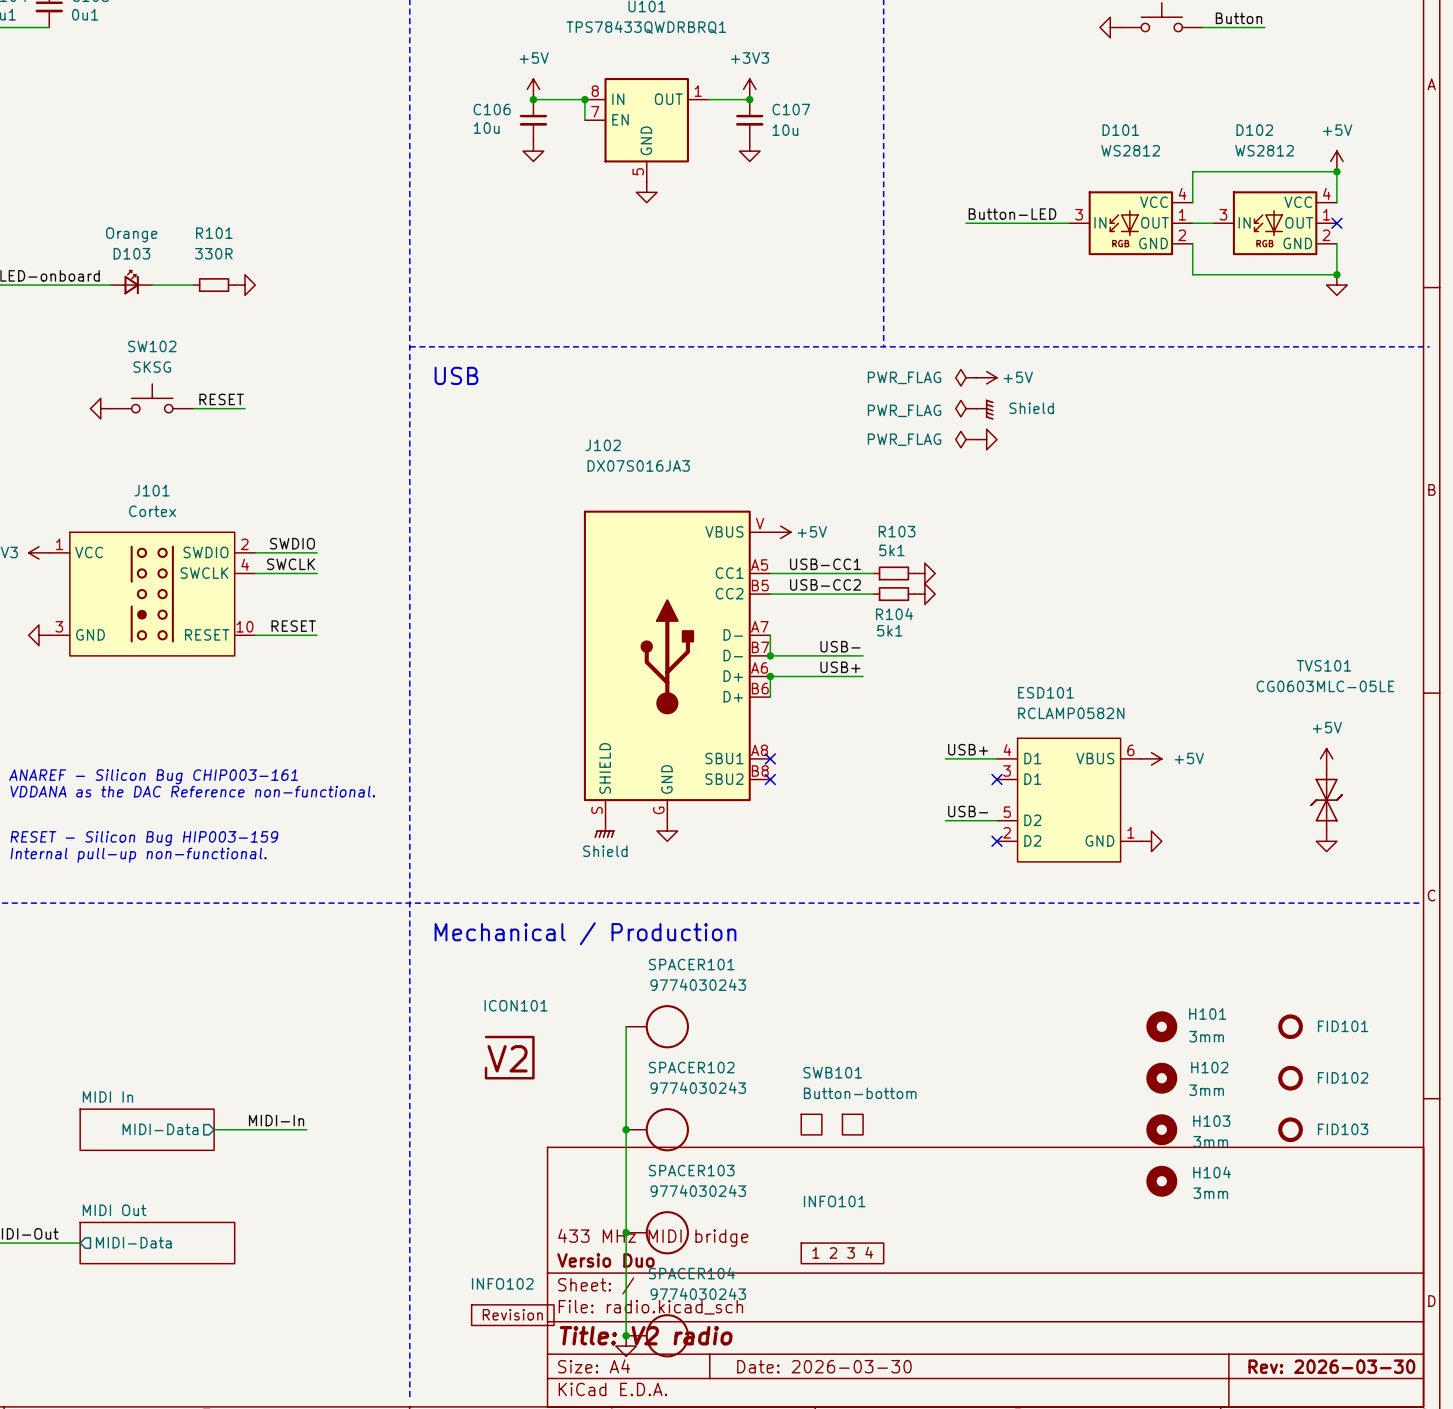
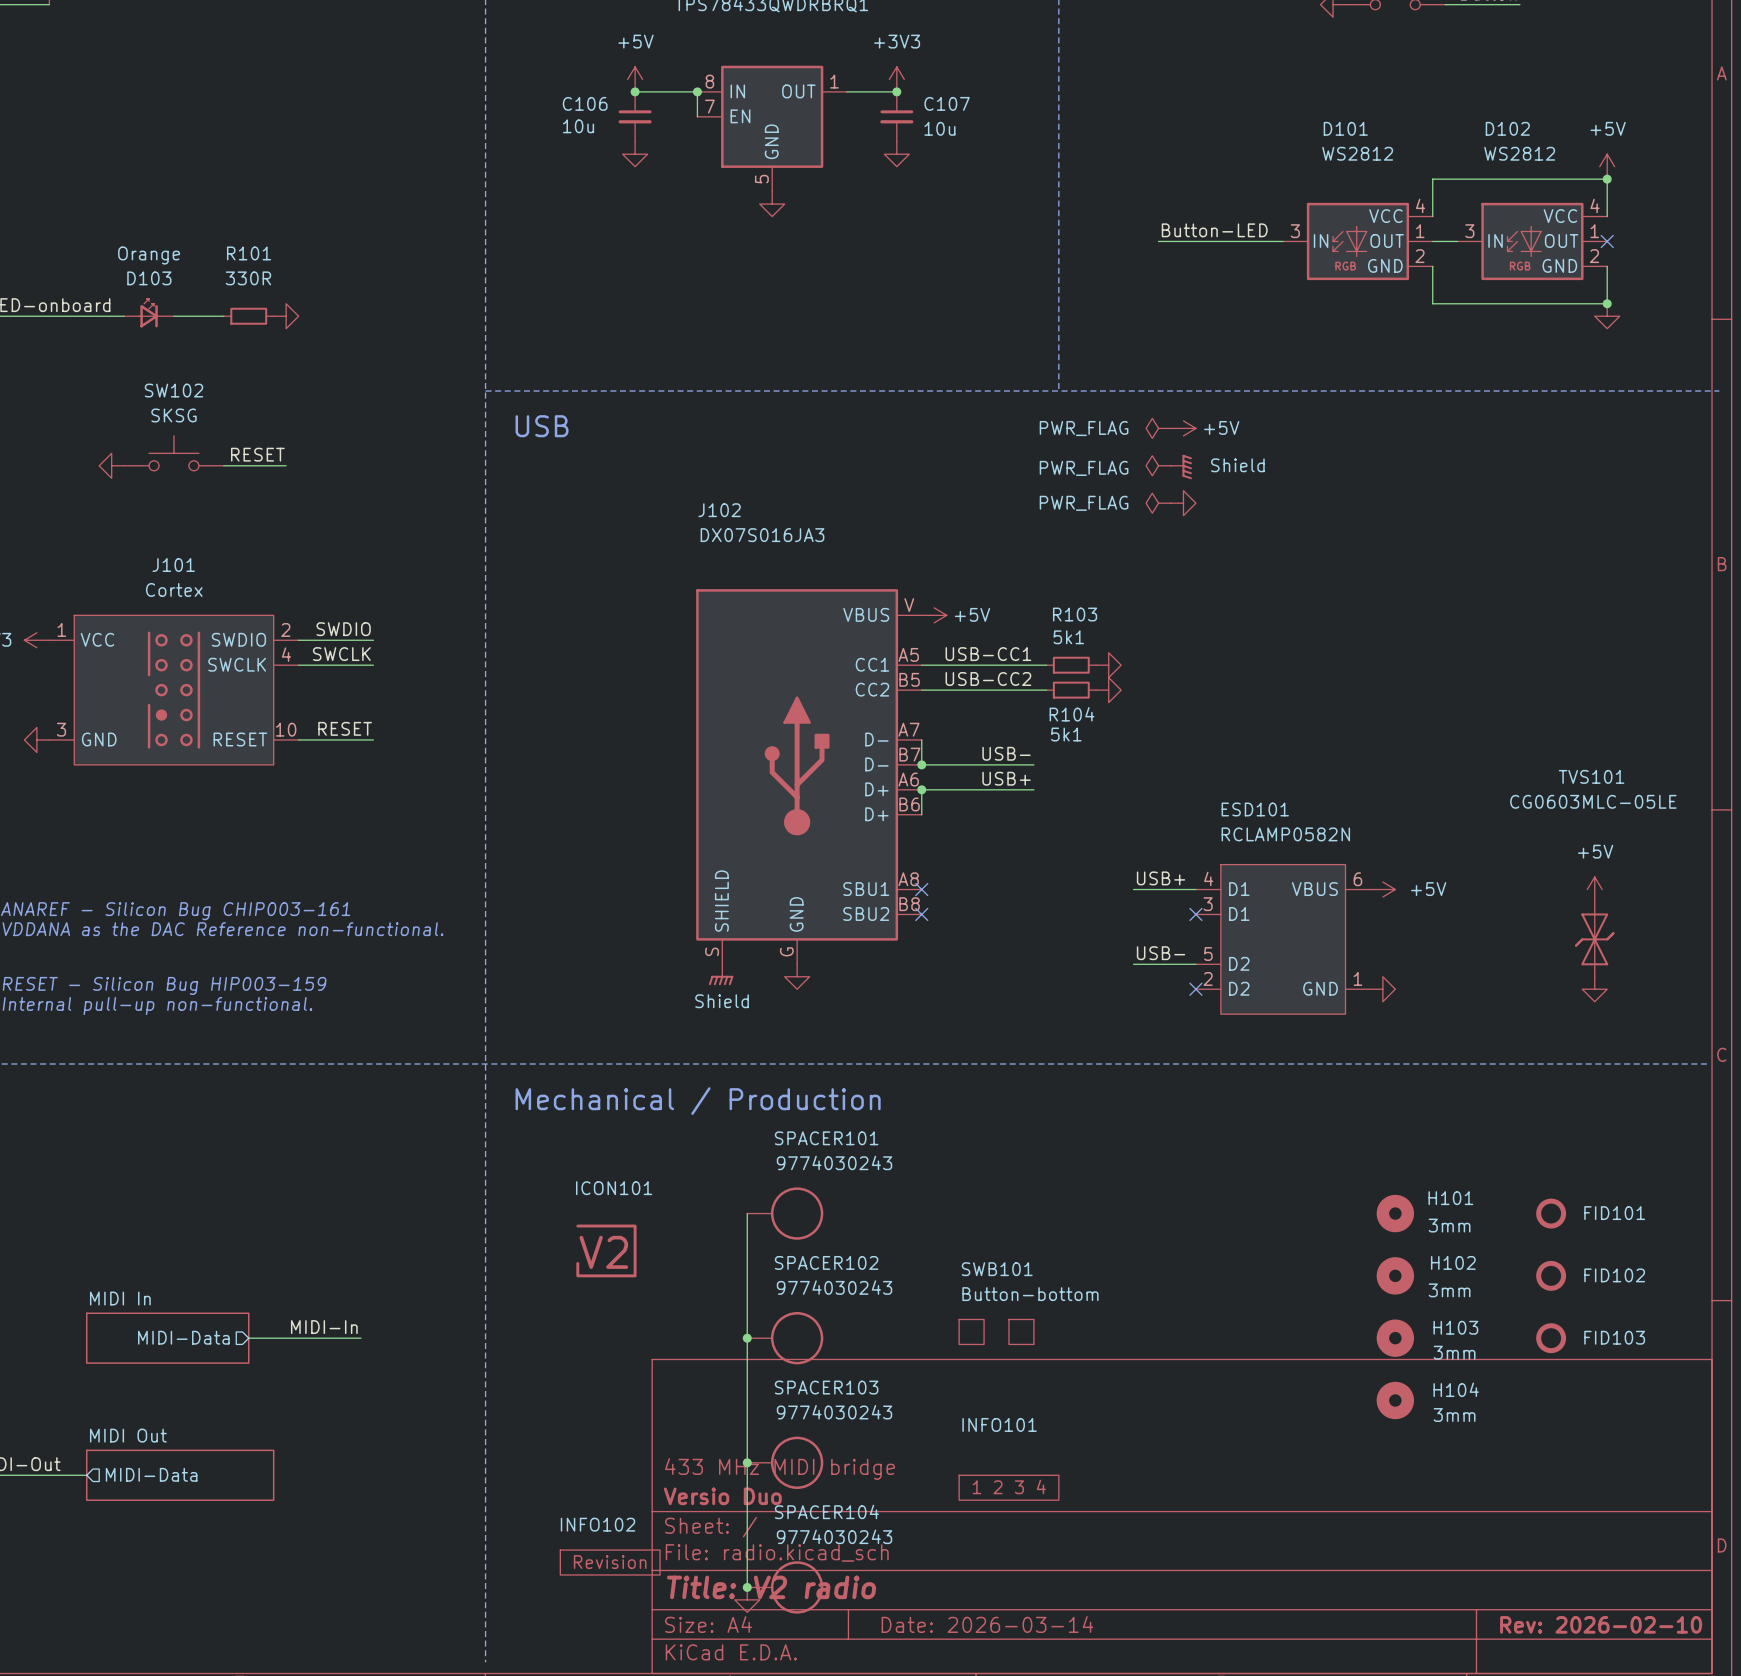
title block: Date: 2026-03-30 (824, 1366) -> Date: 2026-03-14 (987, 1624)
title block: Rev: 2026-03-30 (1331, 1366) -> Rev: 2026-02-10 (1601, 1624)

